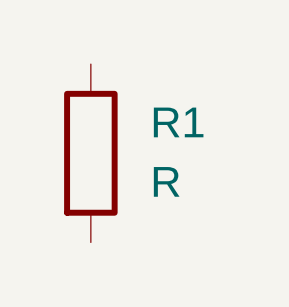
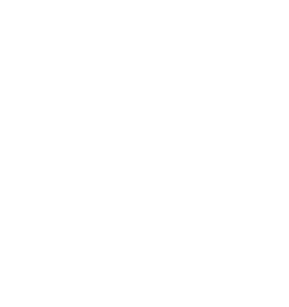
R1: R (90, 153) -> none

